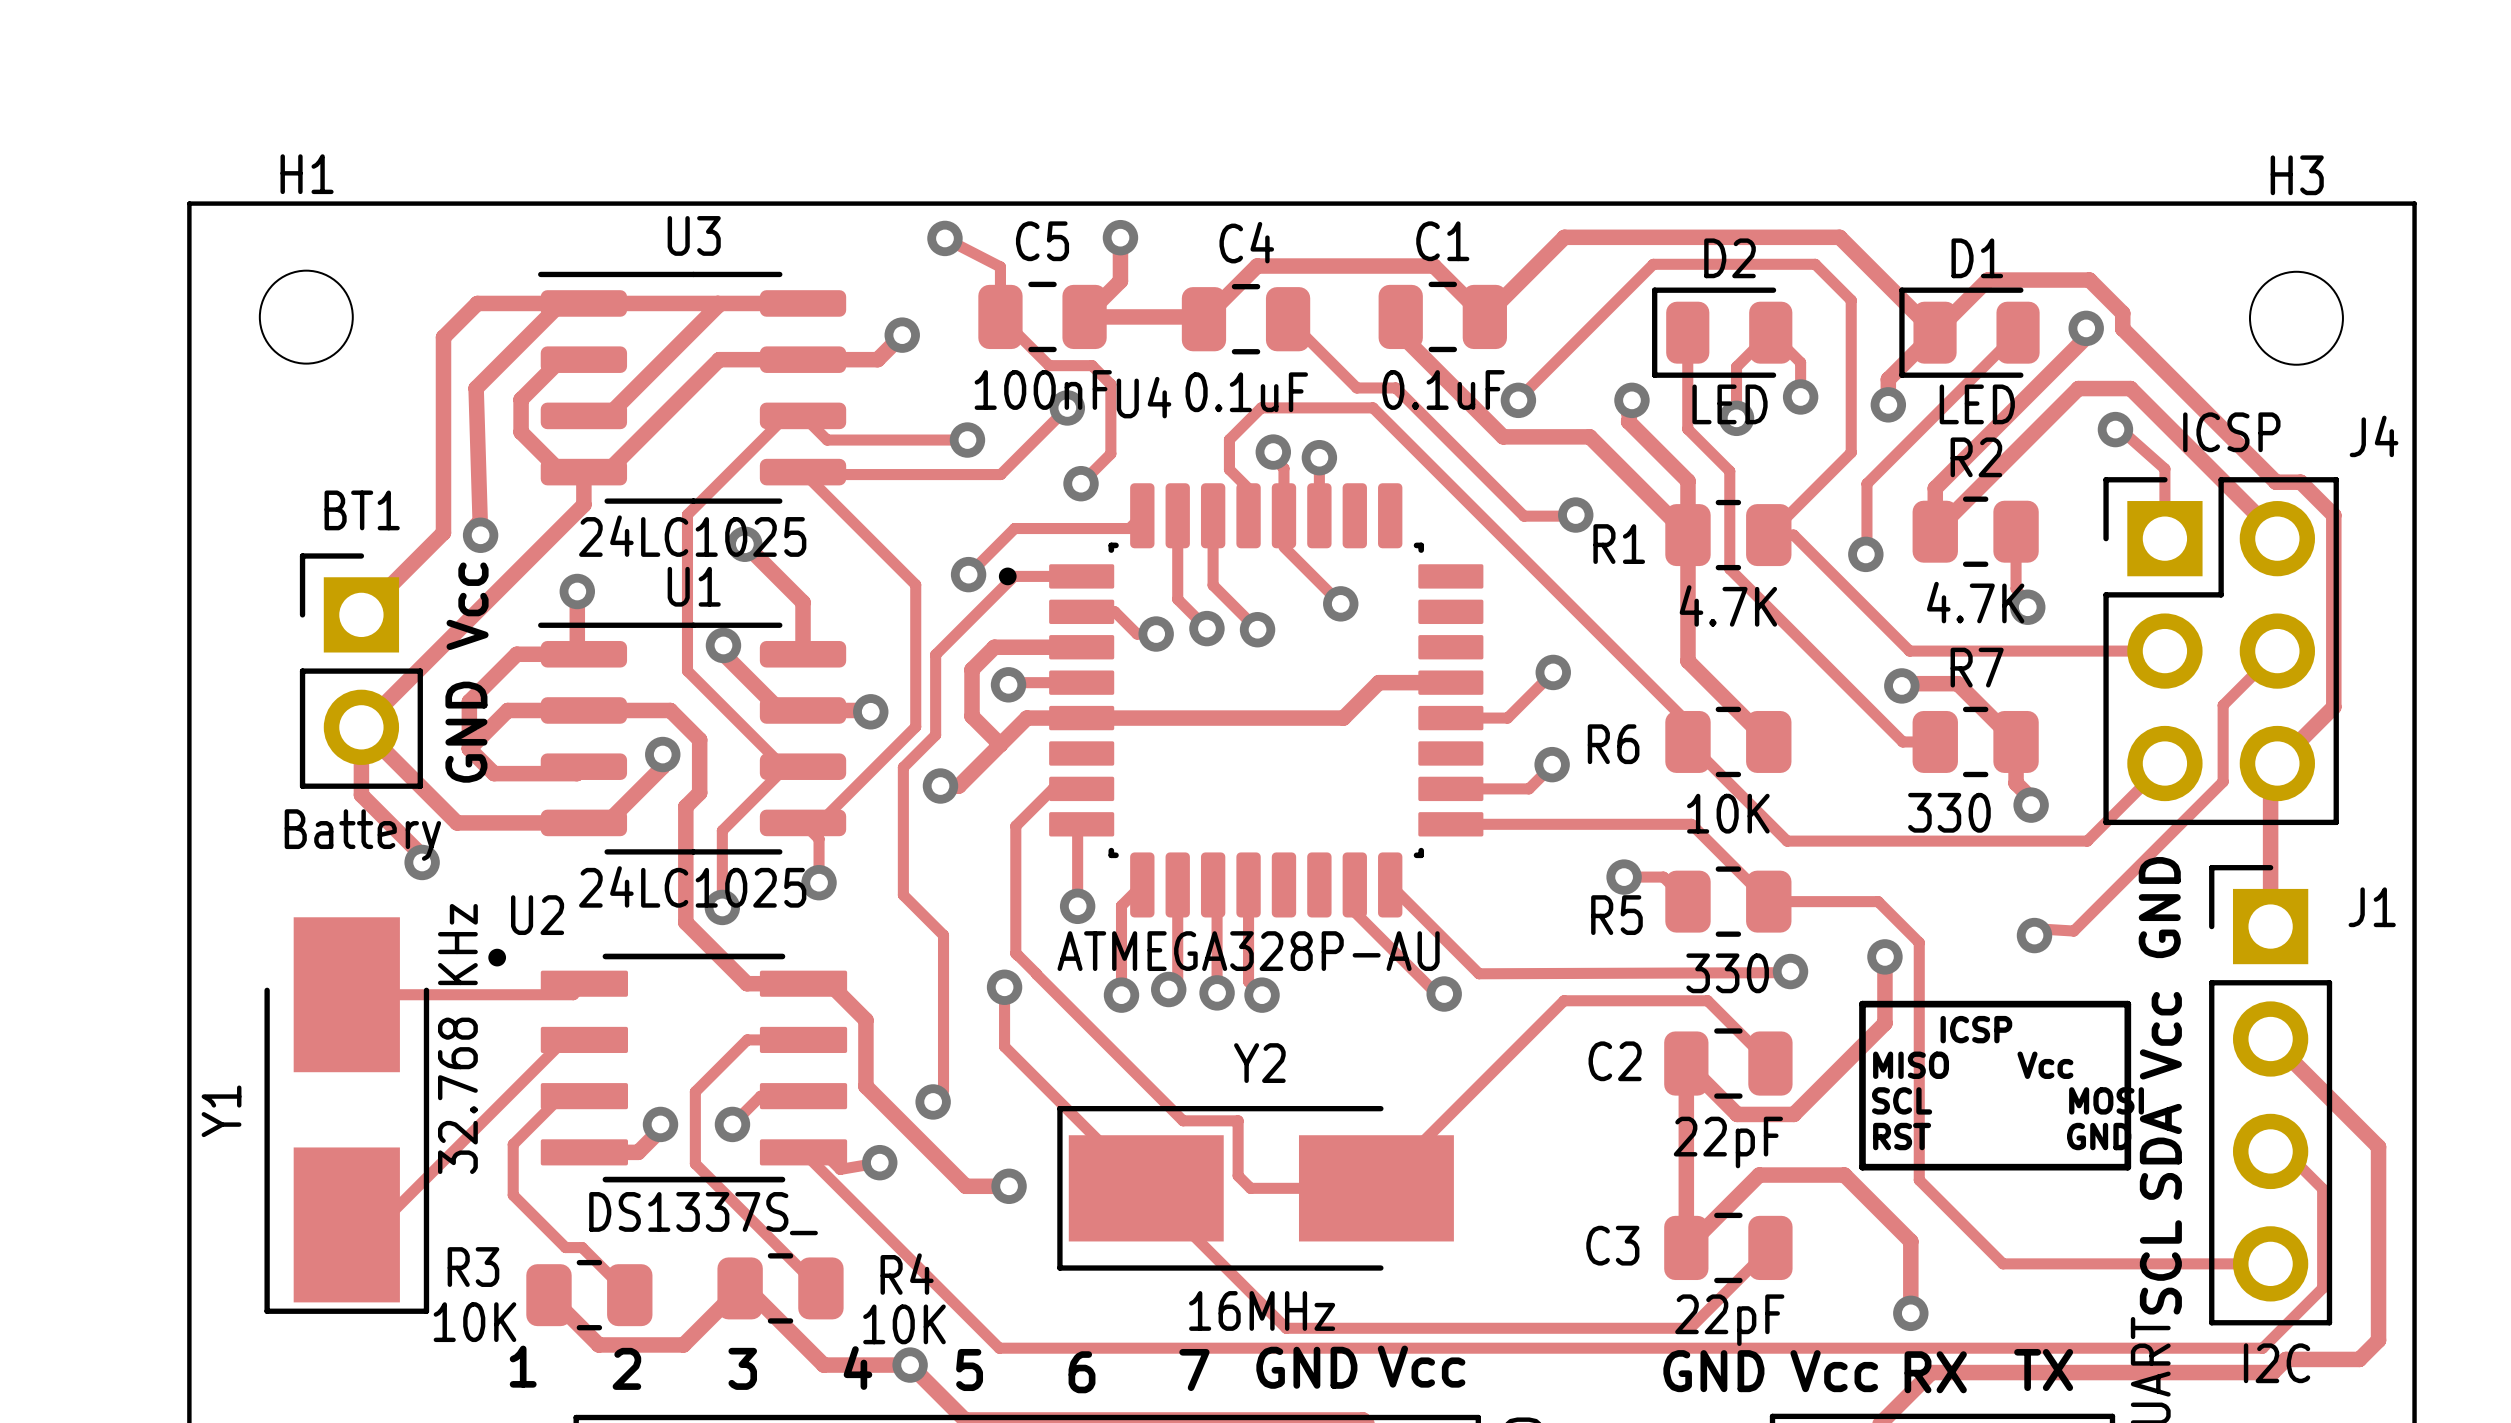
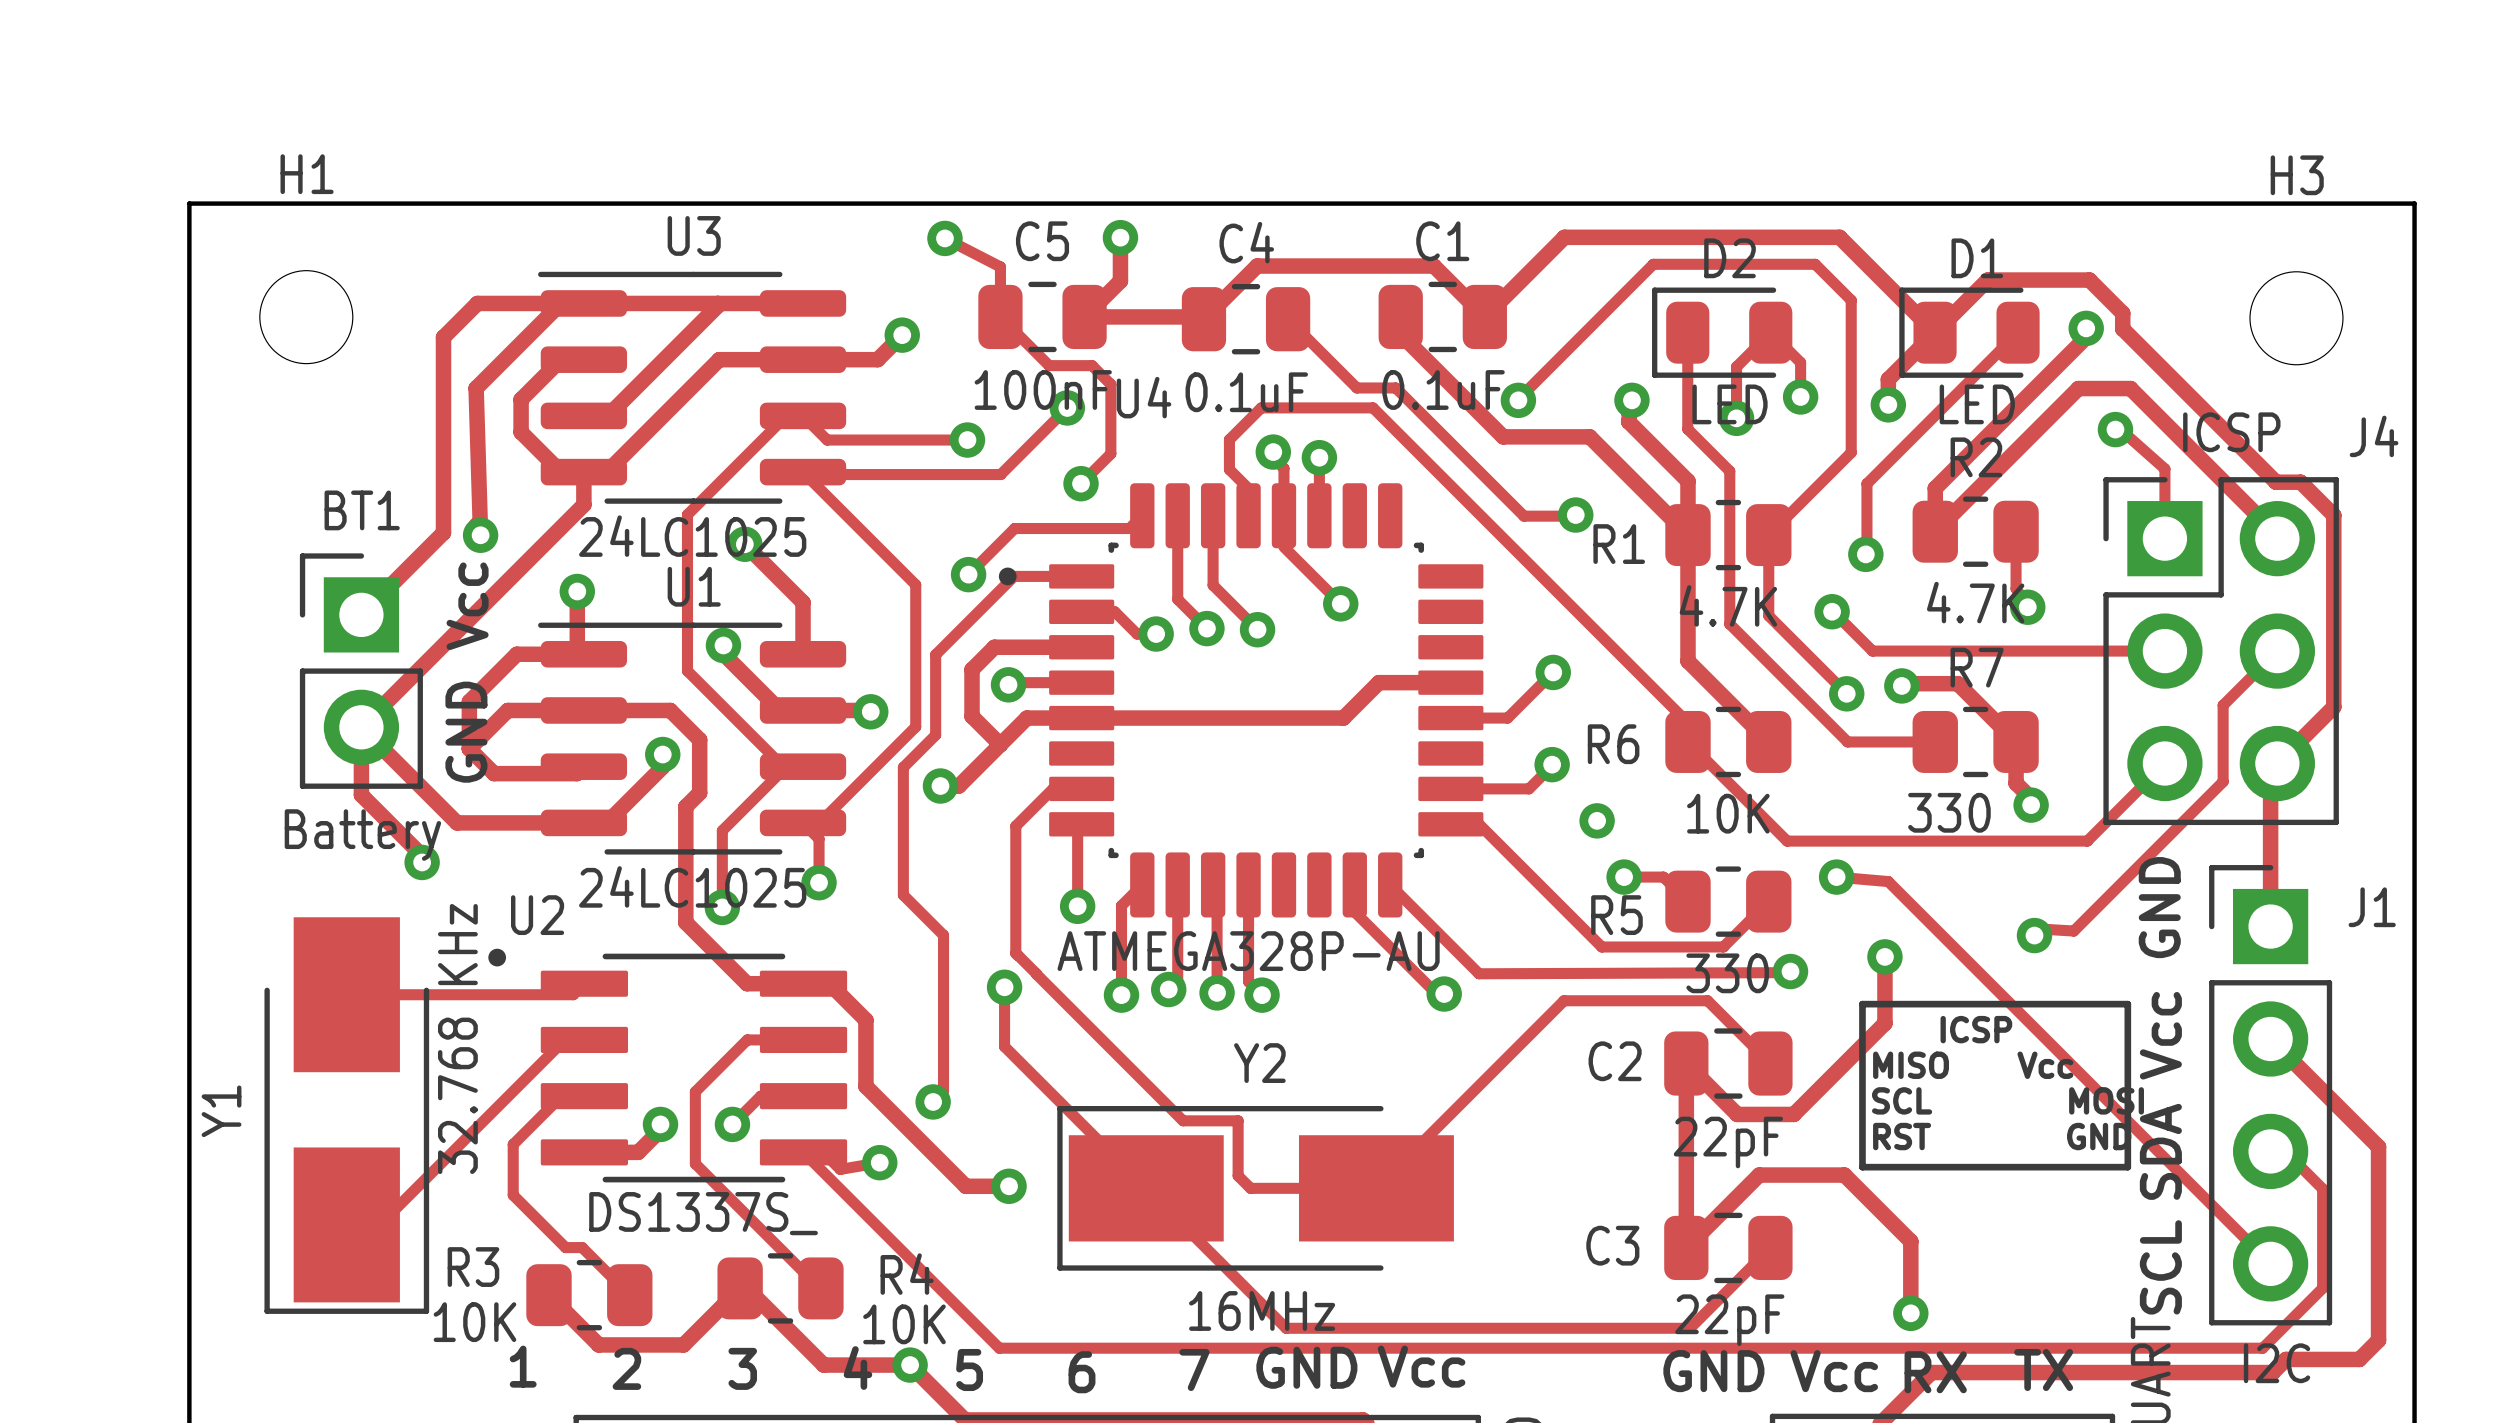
track: (1768, 535) (1793, 535) (1909, 651) -> (1768, 535) (1768, 615) (1846, 693)
track: (1729, 568) (1902, 741) -> (1729, 568) (1729, 624) (1847, 741) (1902, 741)
via: none -> (1832, 611)
track: none -> (1833, 611) (1872, 651) (1909, 651)
via: none -> (1846, 693)
via: none -> (1597, 820)
track: (1479, 824) (1691, 824) (1768, 901) (1878, 901) (1919, 942) (1919, 1180) (2003, 1263) (2270, 1263) -> (1836, 877) (1888, 881) (2270, 1263)
track: none -> (1479, 824) (1601, 947) (1723, 947) (1768, 901)
via: none -> (1836, 877)

